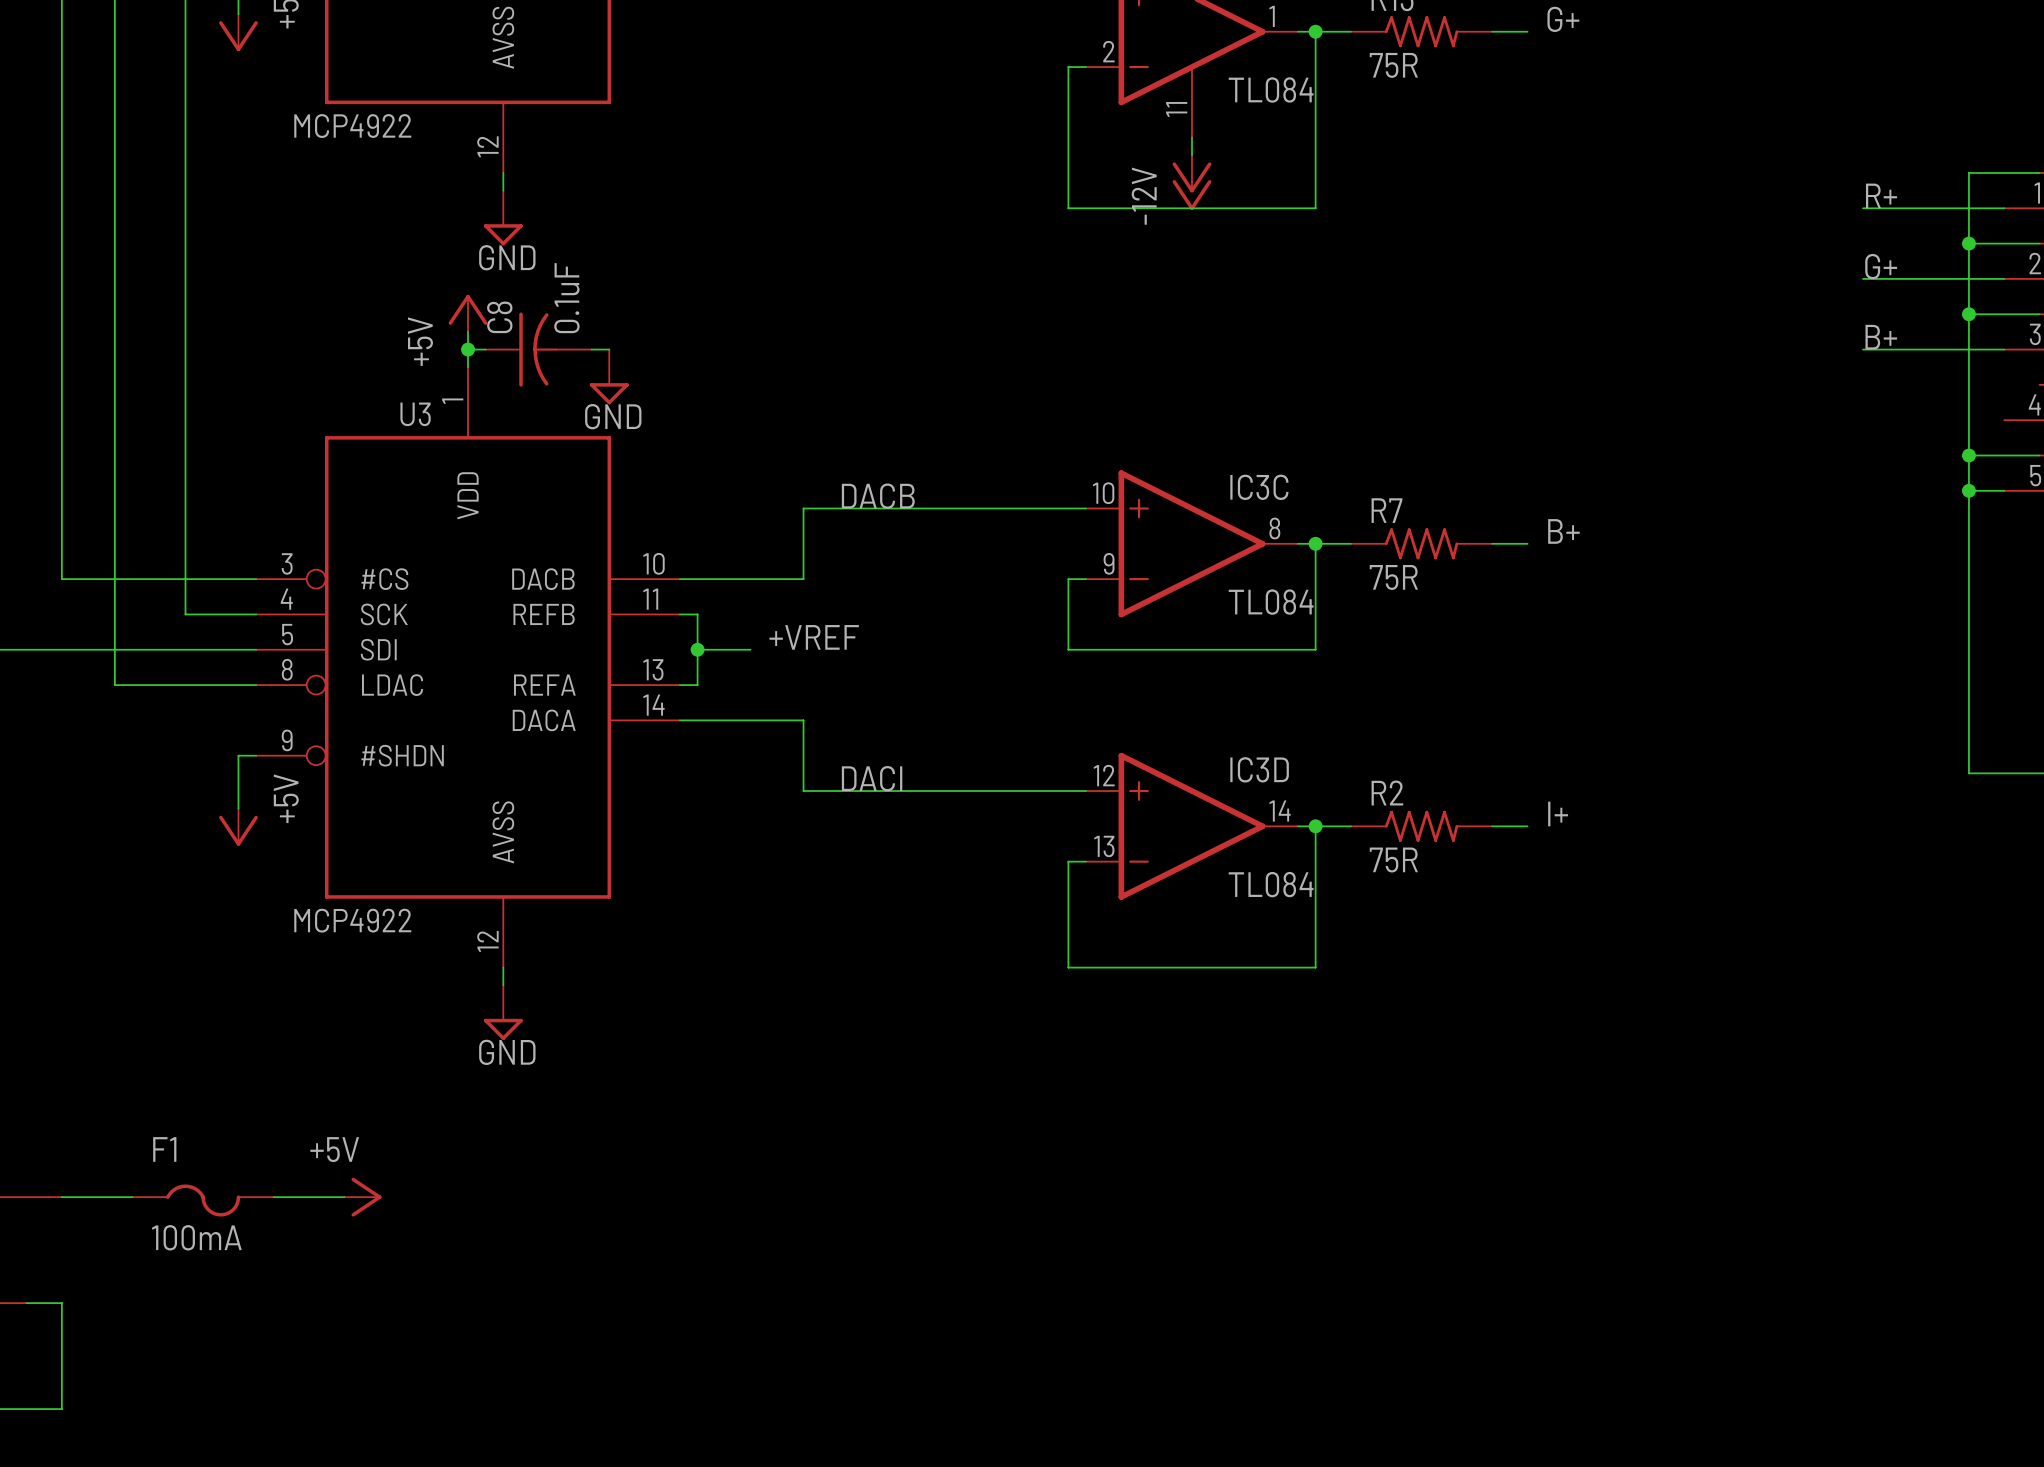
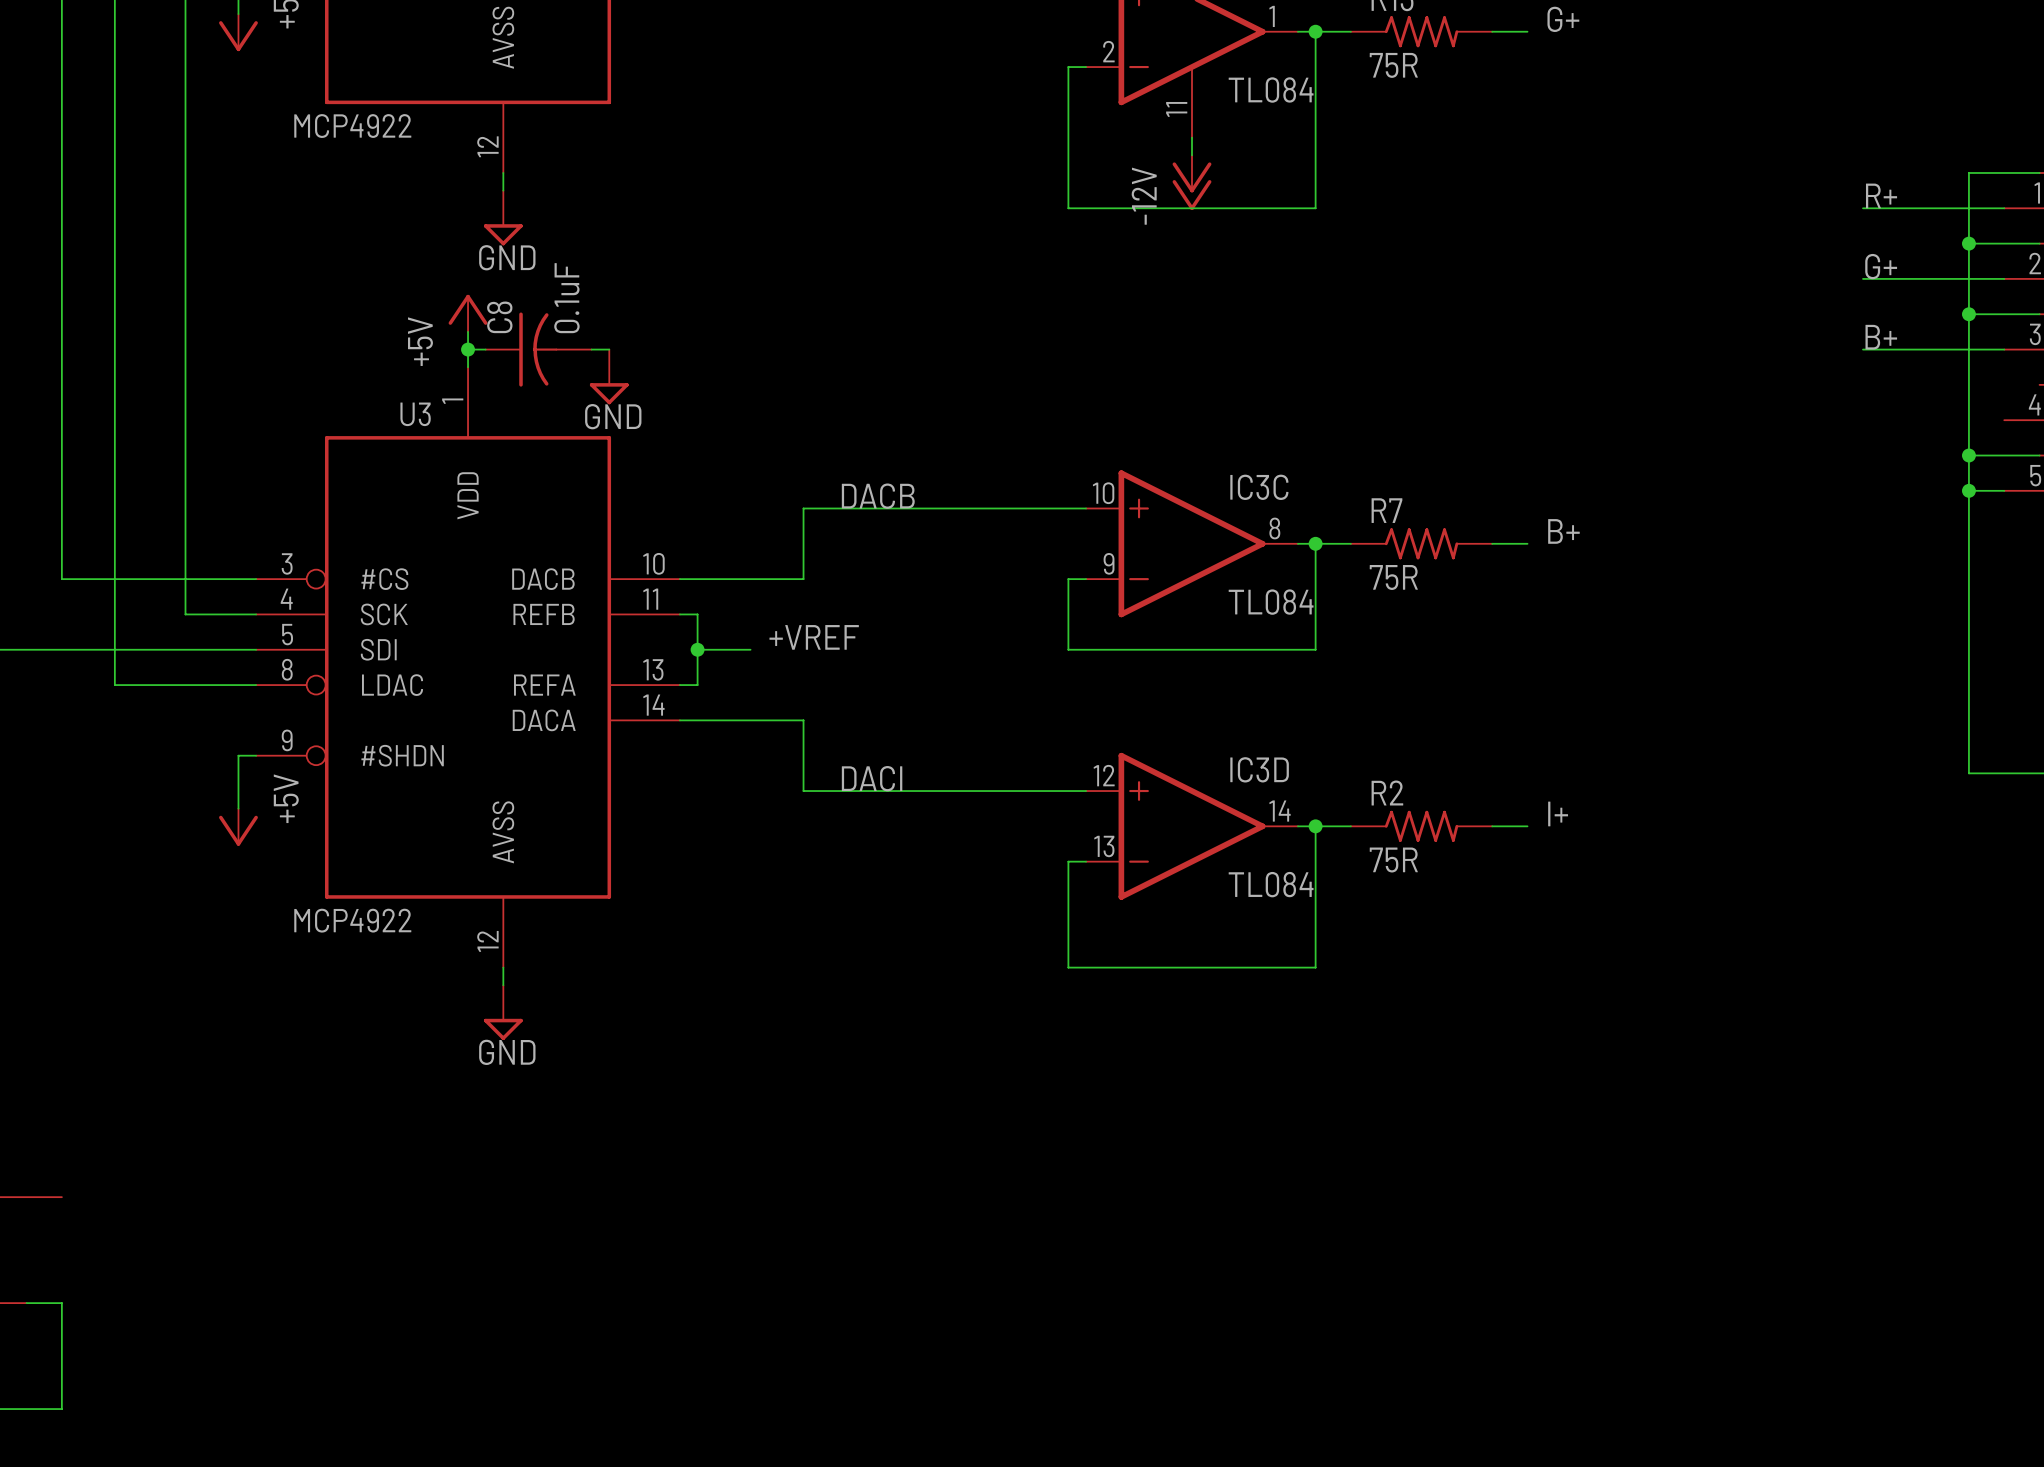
wire: (61, 1197) (132, 1197) -> none
wire: (273, 1197) (344, 1197) -> none
power symbol: +5V (362, 1197) -> none
F1: 100mA (203, 1200) -> none

